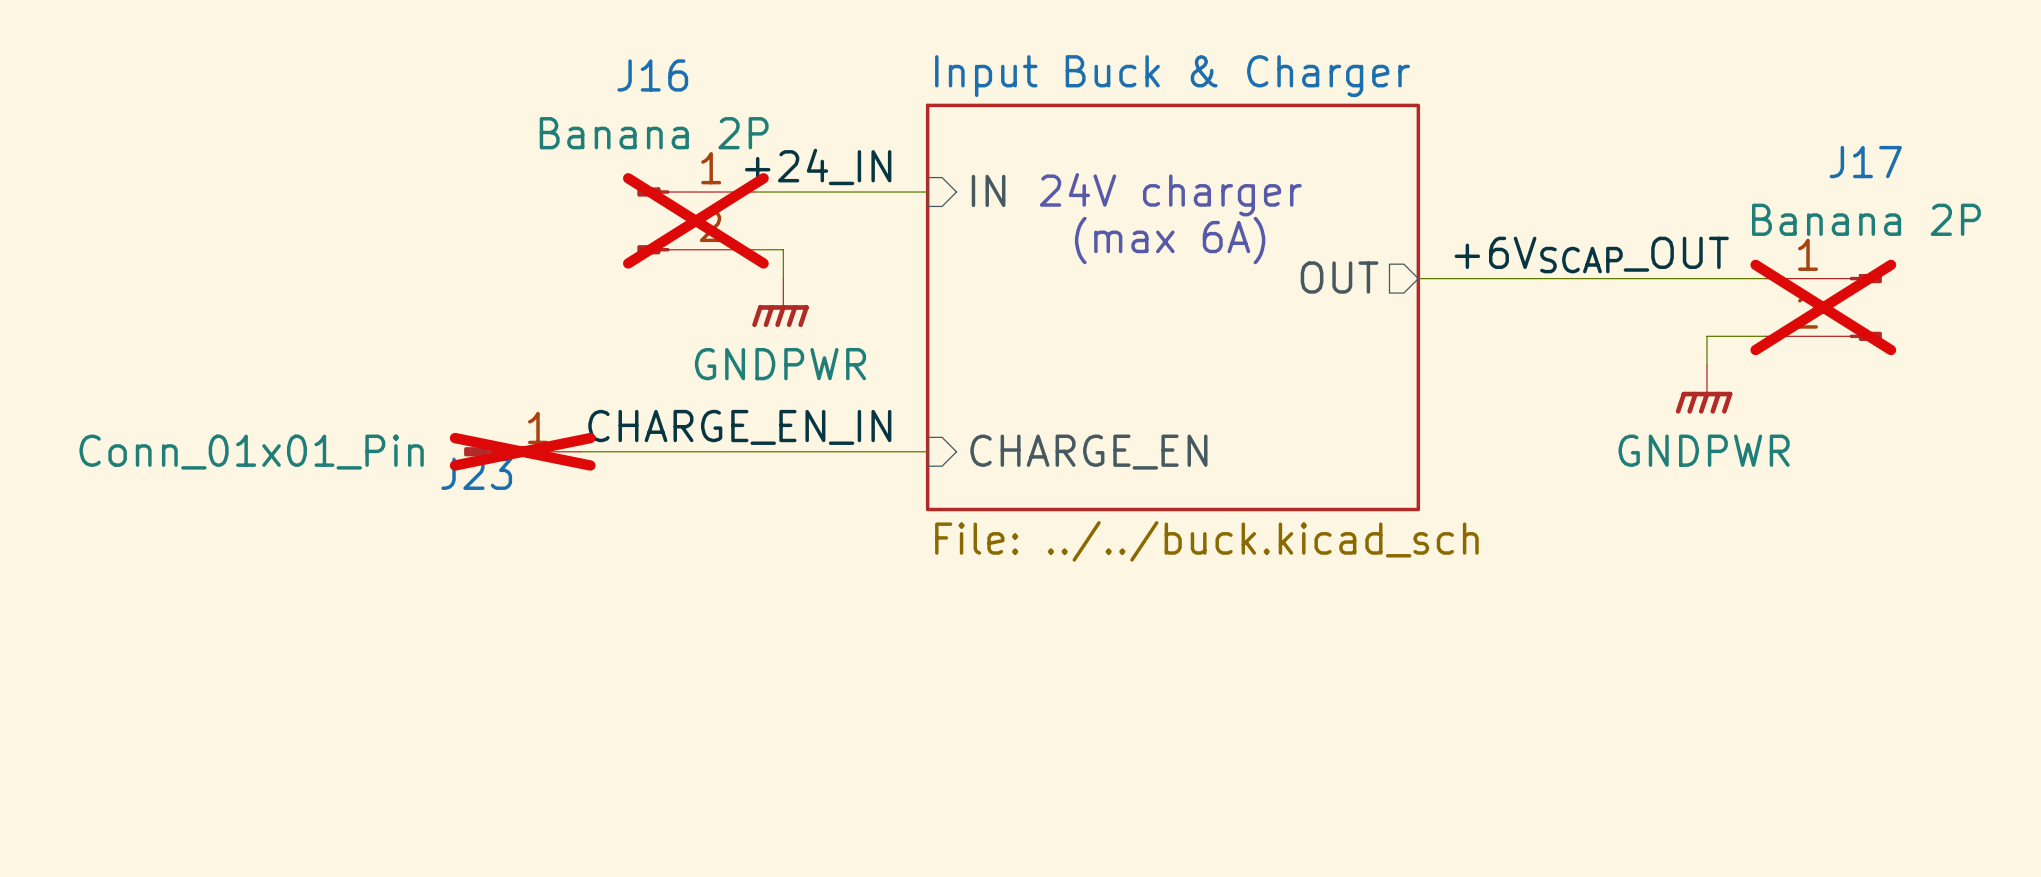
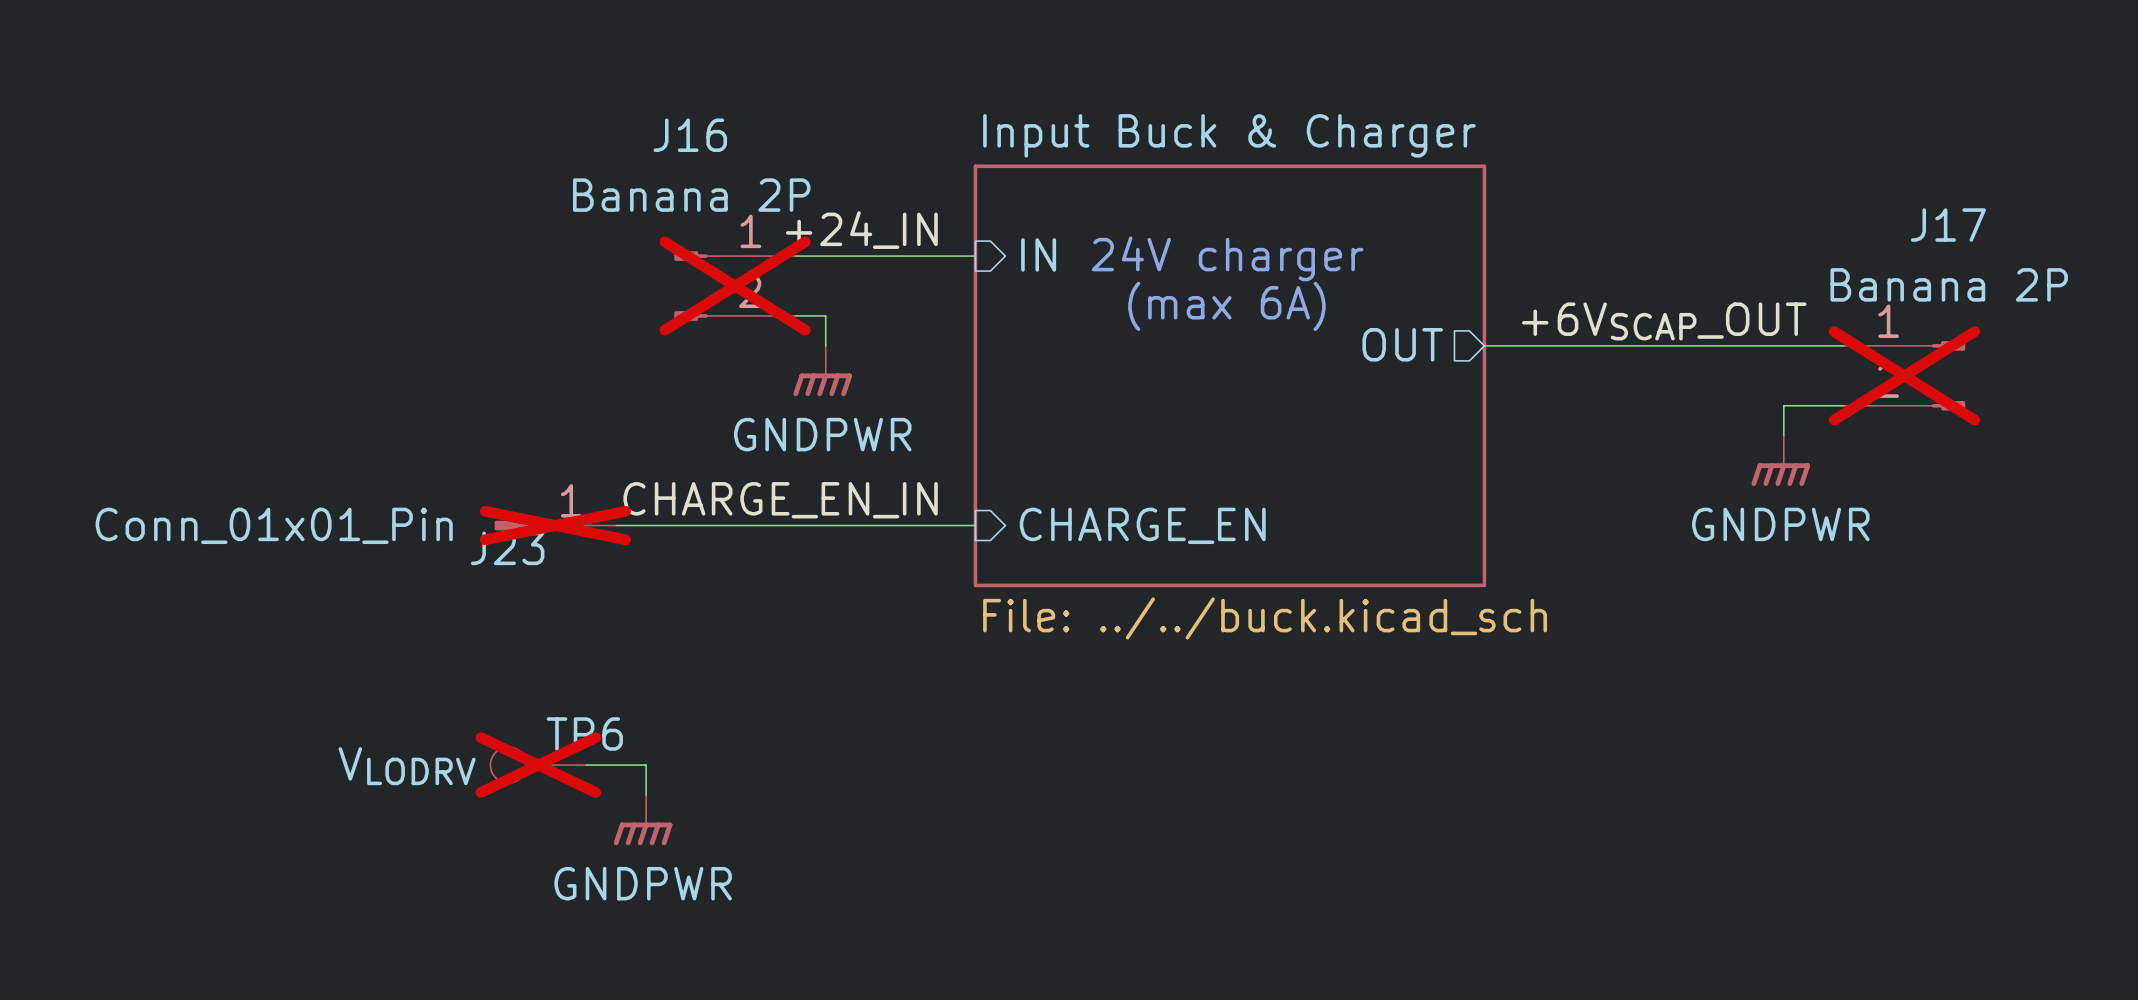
TP6: none -> VLODRV (538, 765)
wire: none -> (586, 765) (646, 765) (646, 794)
power symbol: none -> GNDPWR (643, 820)

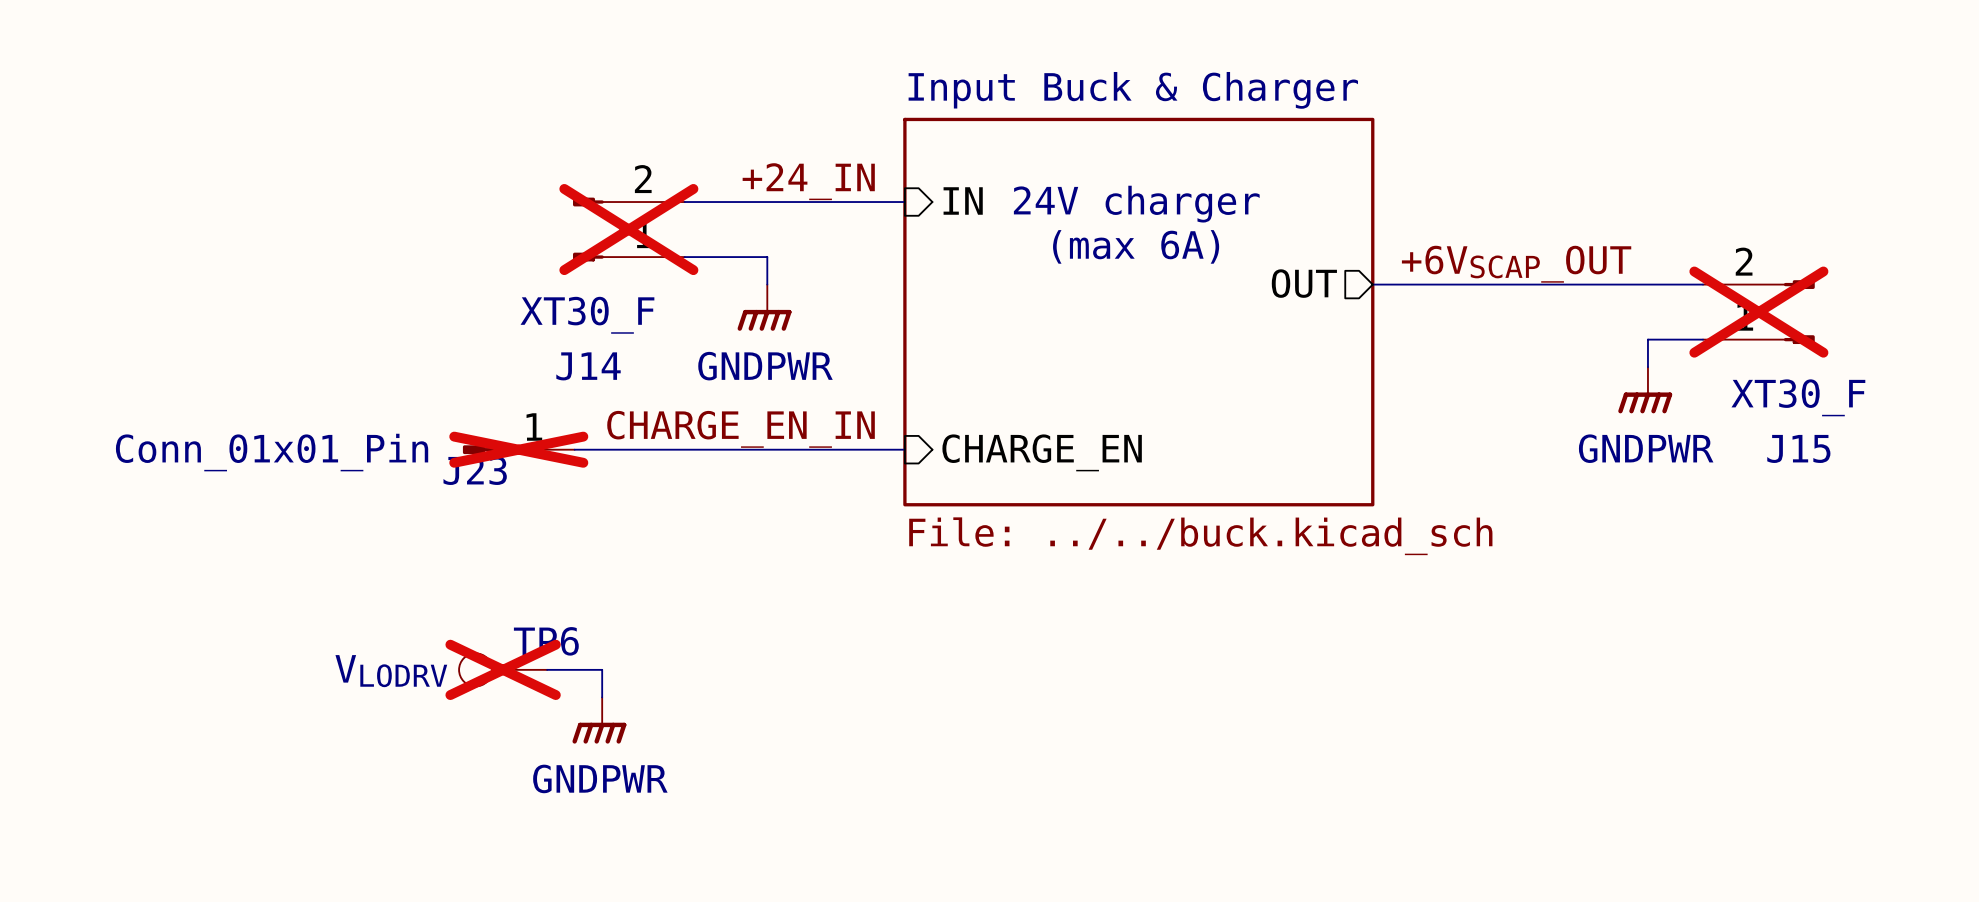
J17 name: J17 (1948, 225) -> J15 (1798, 448)
J17 value: Banana 2P (1949, 284) -> XT30_F (1798, 397)
J14: none -> XT30_F (628, 229)
J16: Banana 2P (735, 286) -> none
J17 flip: as is (1948, 375) -> up-down (1799, 312)

